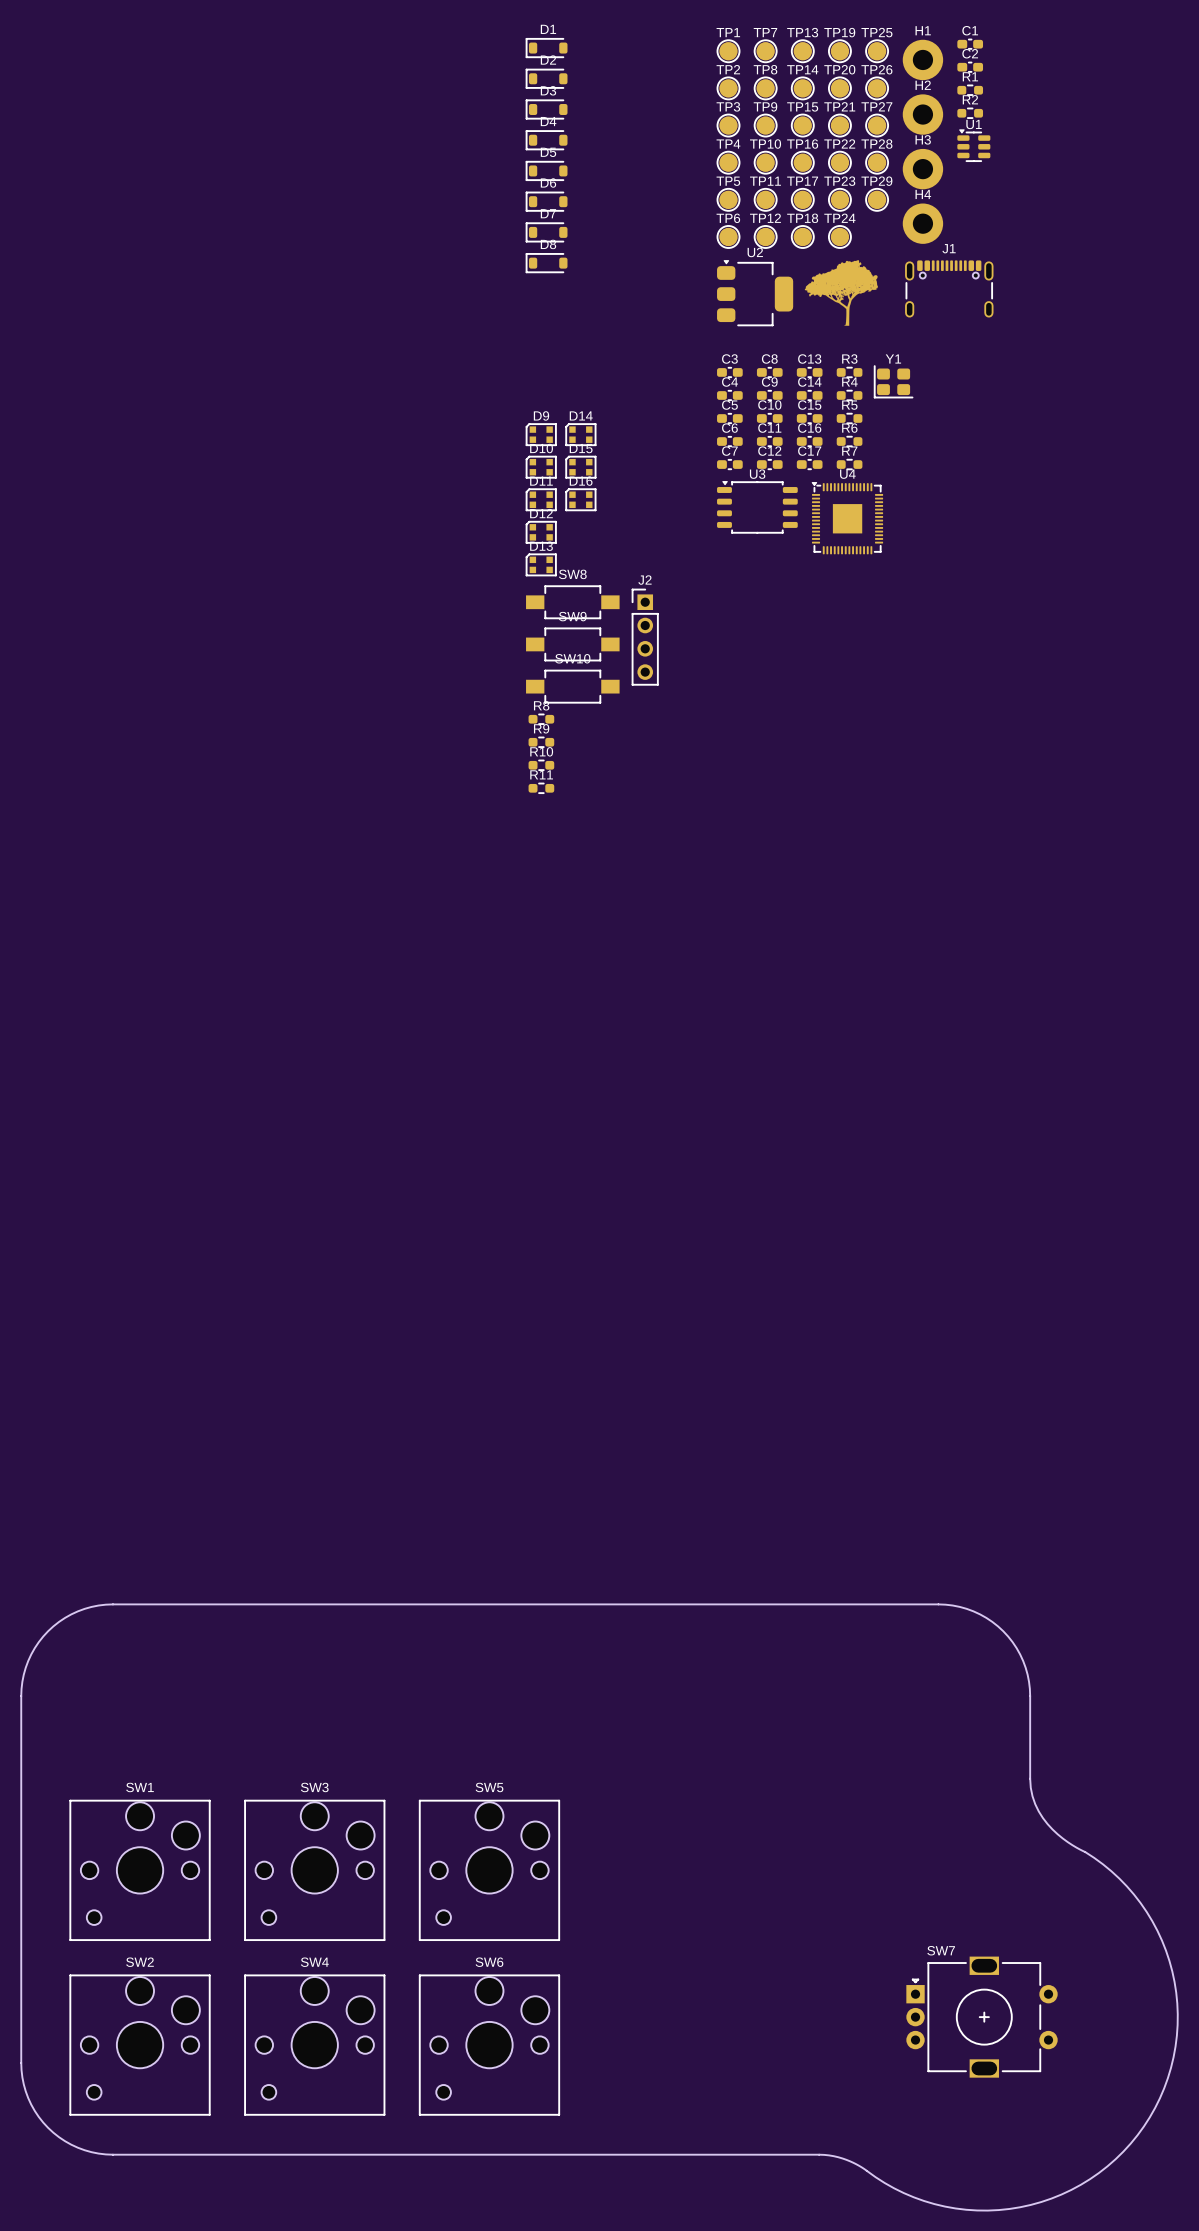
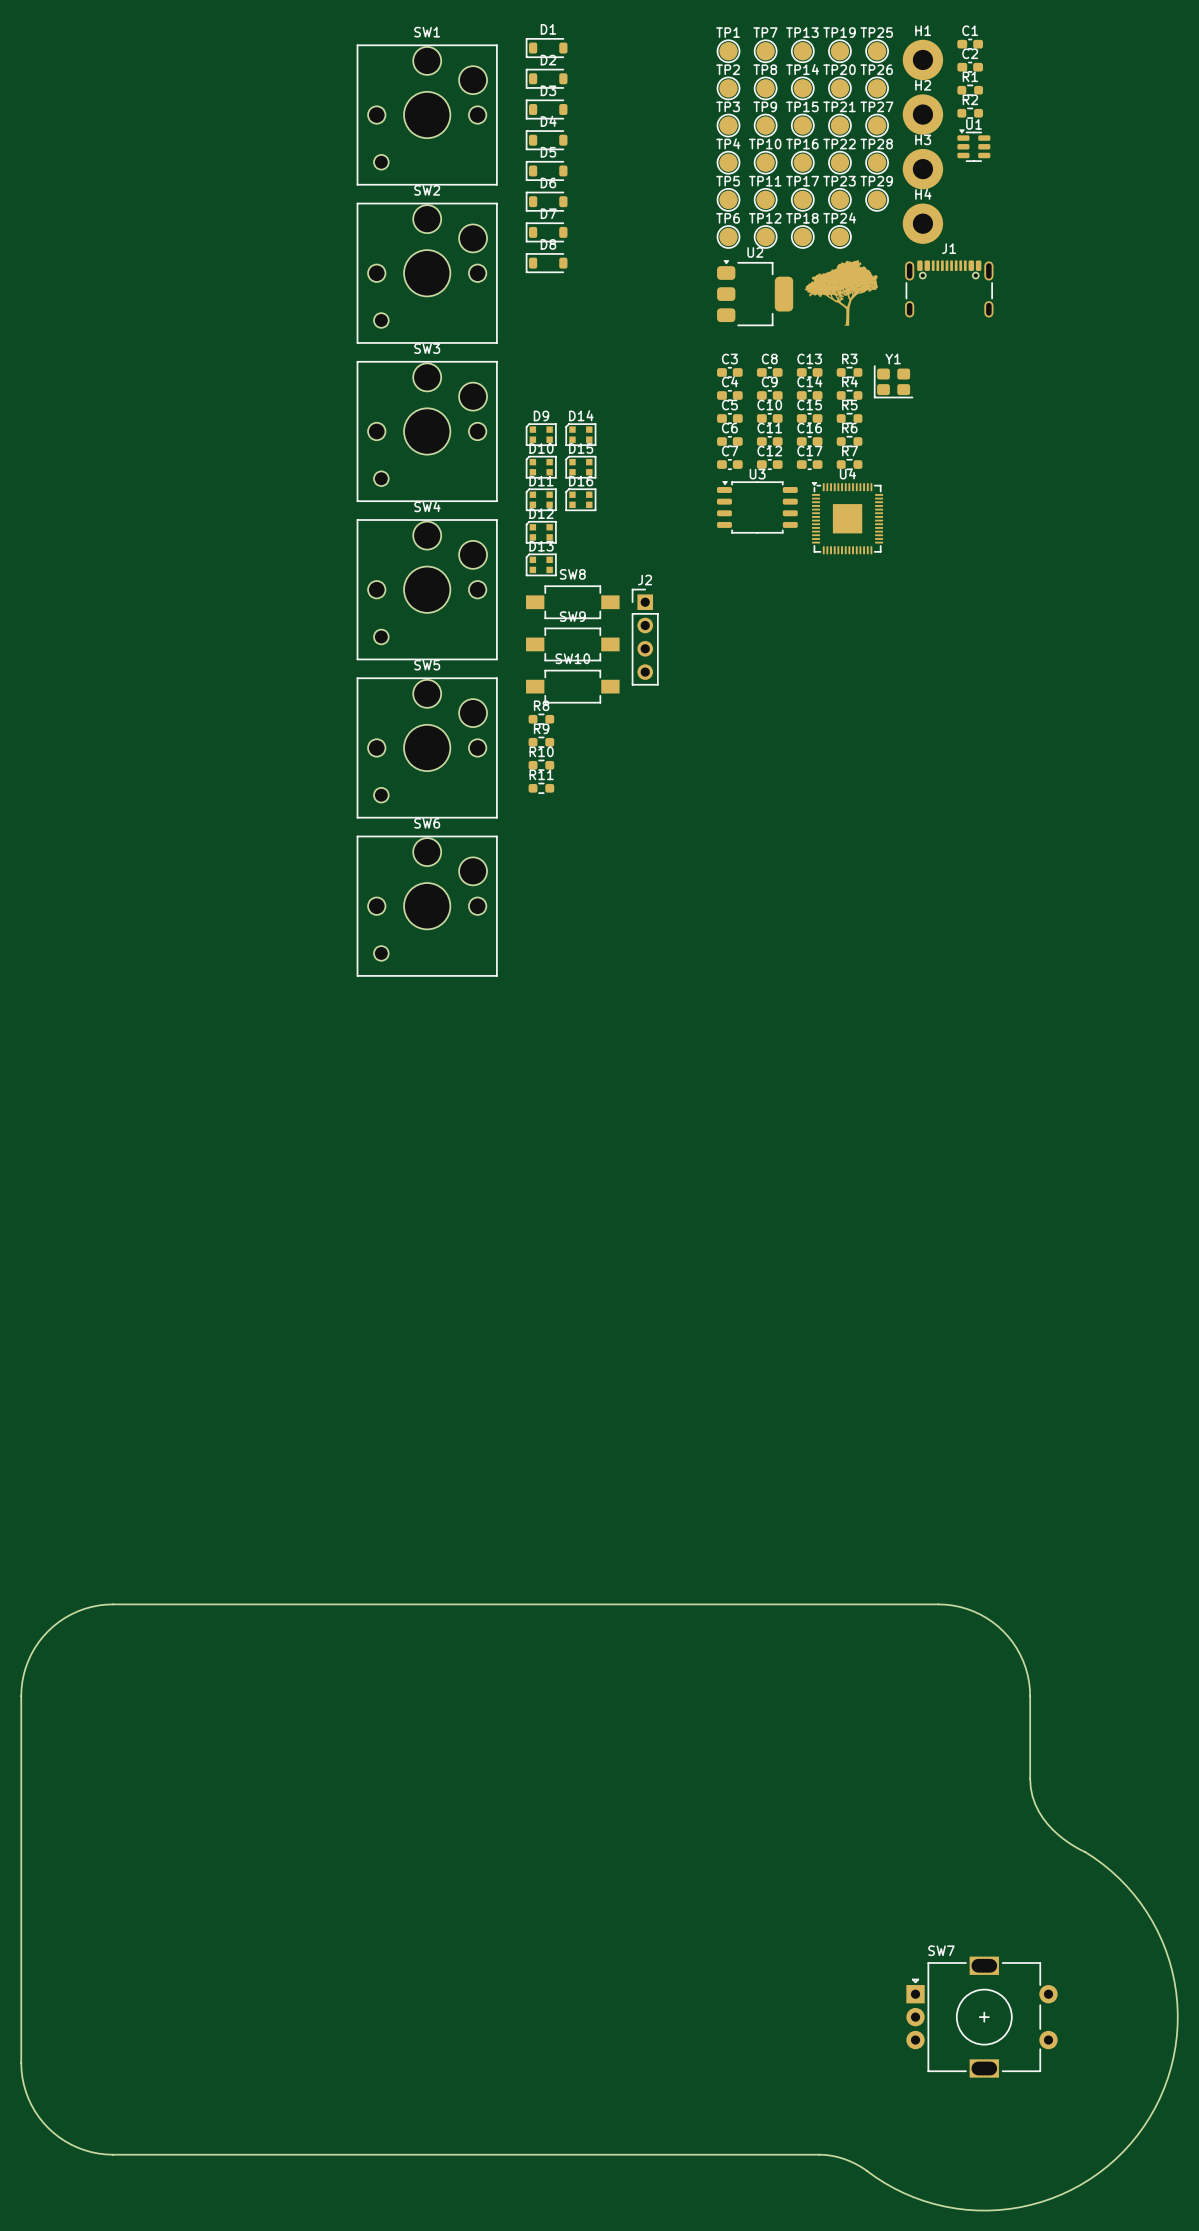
SW1 position: (140, 1870) -> (427, 115)
SW3 position: (314, 1870) -> (427, 431)
SW5 position: (489, 1870) -> (427, 747)
SW2 position: (140, 2045) -> (427, 273)
SW4 position: (314, 2045) -> (427, 589)
SW6 position: (489, 2045) -> (427, 906)

